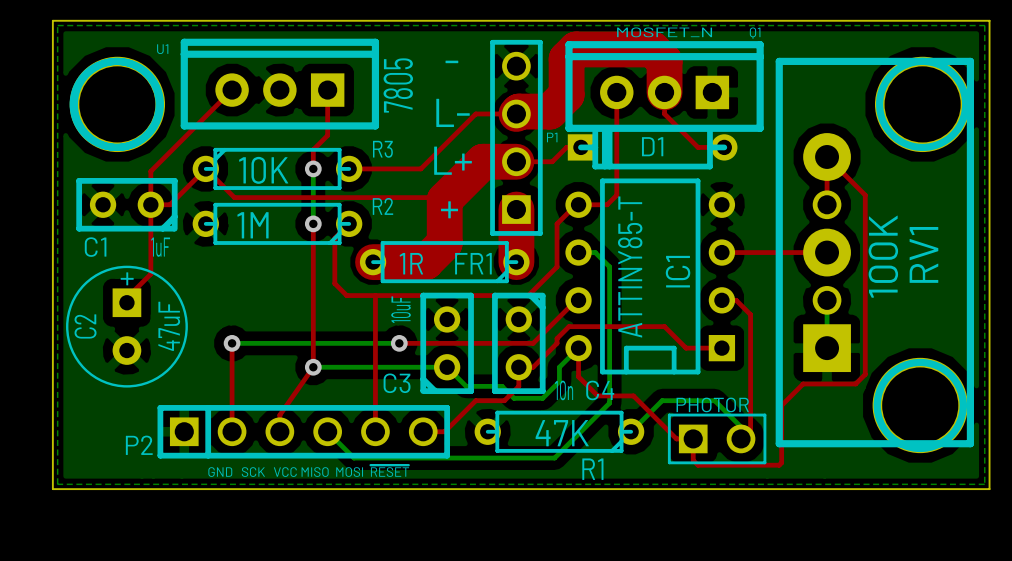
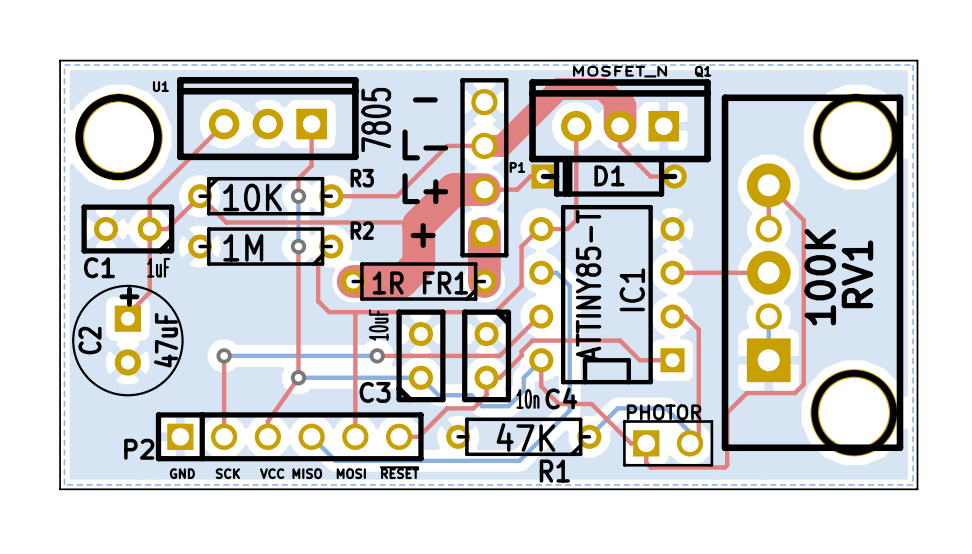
top track: (664, 70) (664, 61) (652, 49) (576, 49) (566, 59) (566, 94) (549, 111) (518, 111) (516, 113) -> (620, 106) (602, 89) (558, 89) (501, 145) (484, 145)

